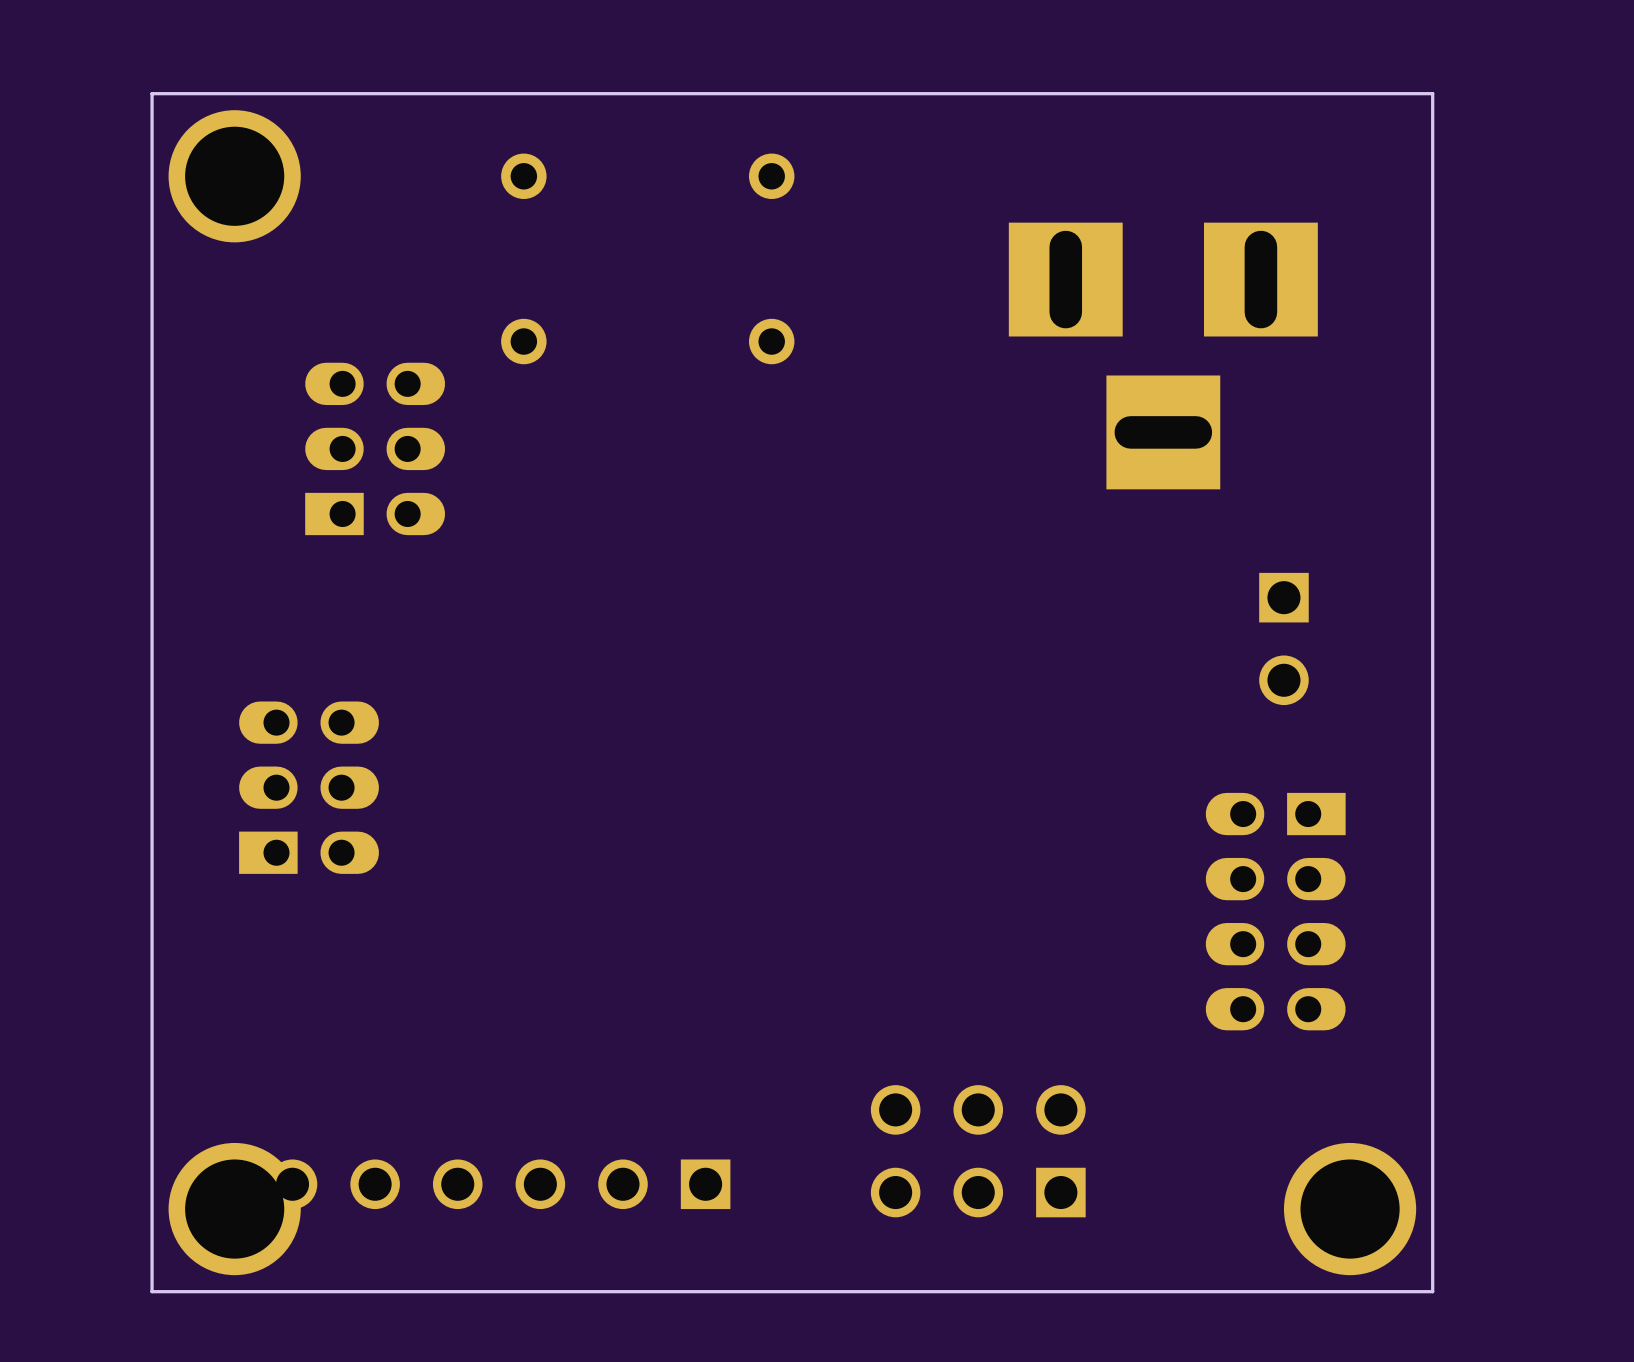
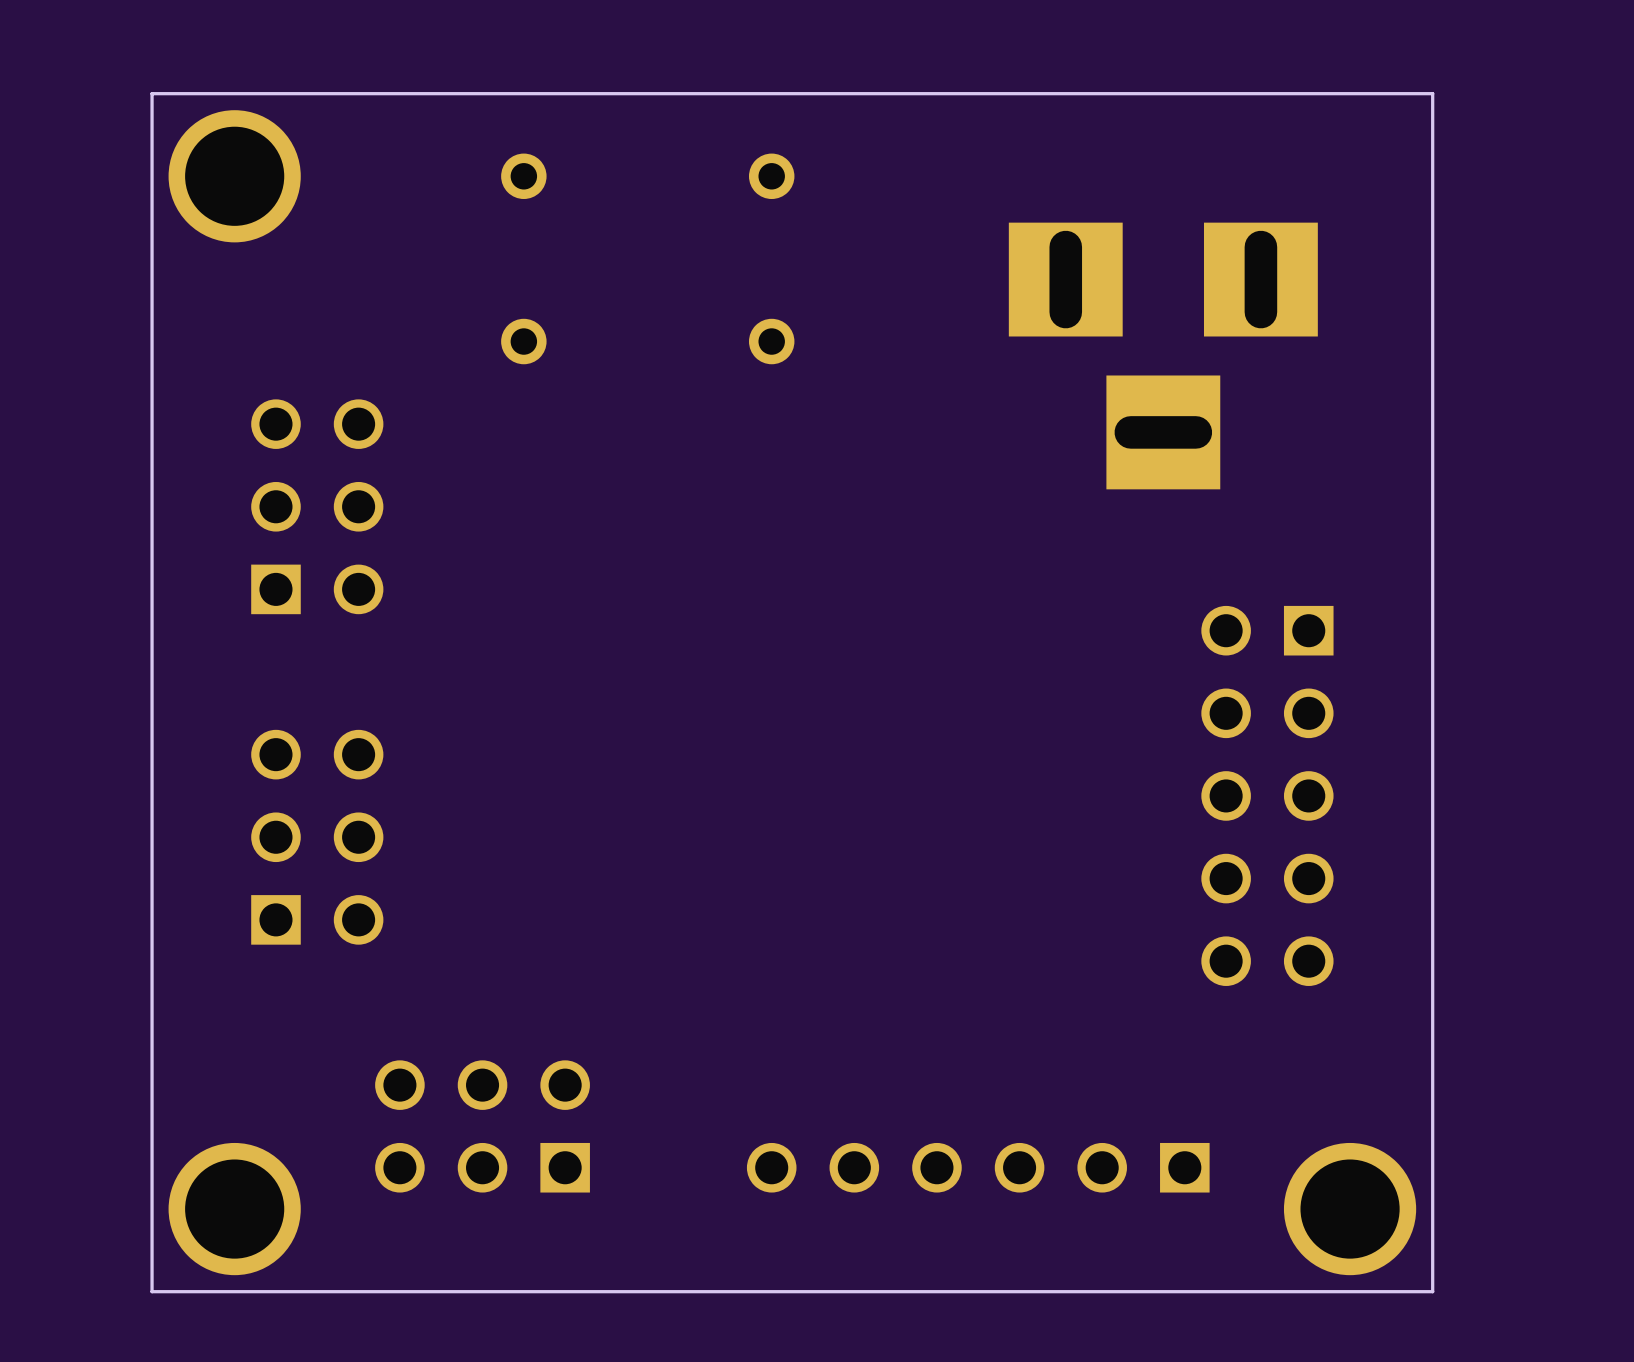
part: (375, 448) -> none
part: none -> (317, 506)
part: (1283, 638) -> none
part: (309, 787) -> none
part: none -> (1267, 795)
part: none -> (317, 837)
part: (1275, 911) -> none
part footprint: [870, 1085, 1086, 1218] -> [746, 1142, 1210, 1193]
part: none -> (482, 1126)
part: (499, 1184) -> none

